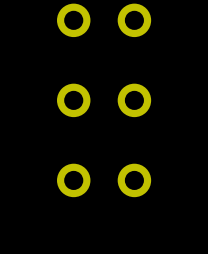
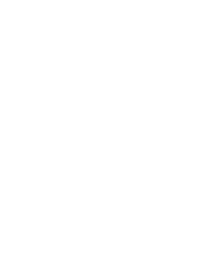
part: (104, 20) -> none
part: (104, 100) -> none
part: (104, 180) -> none

